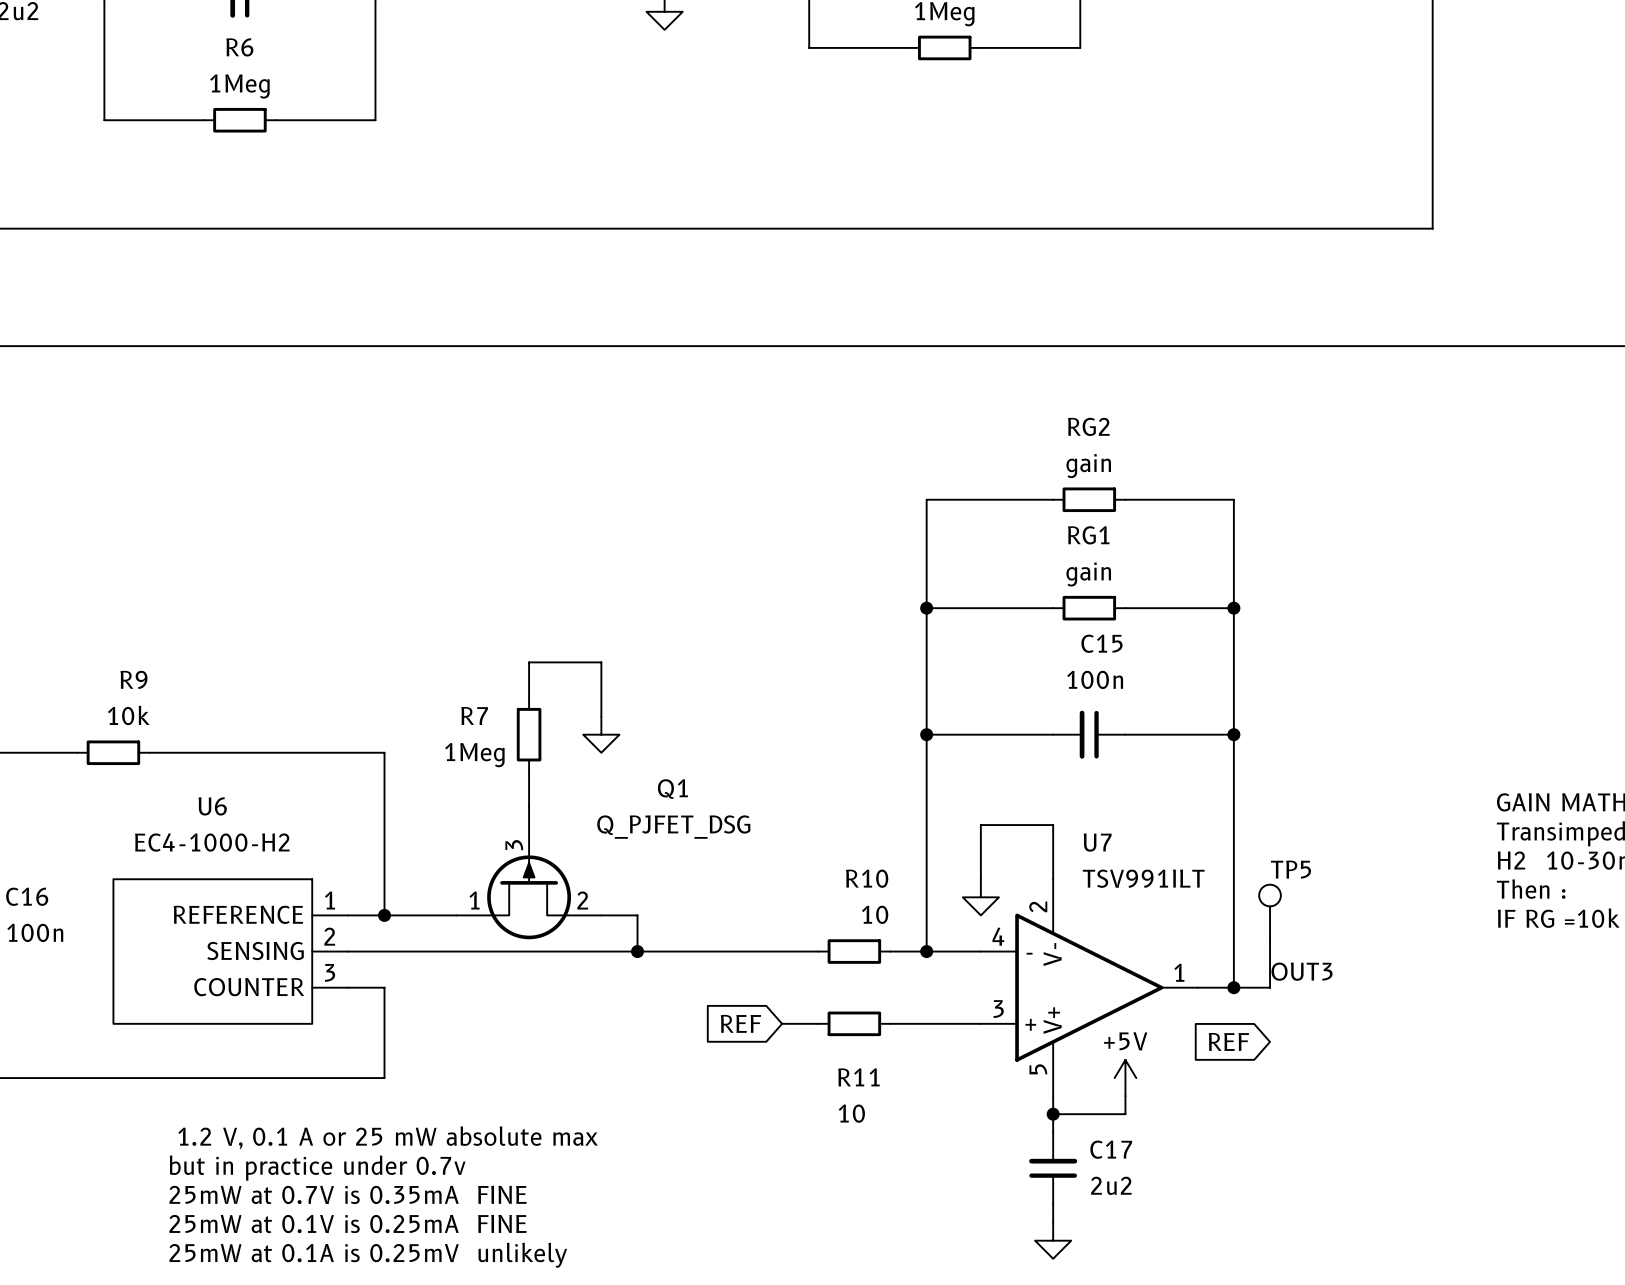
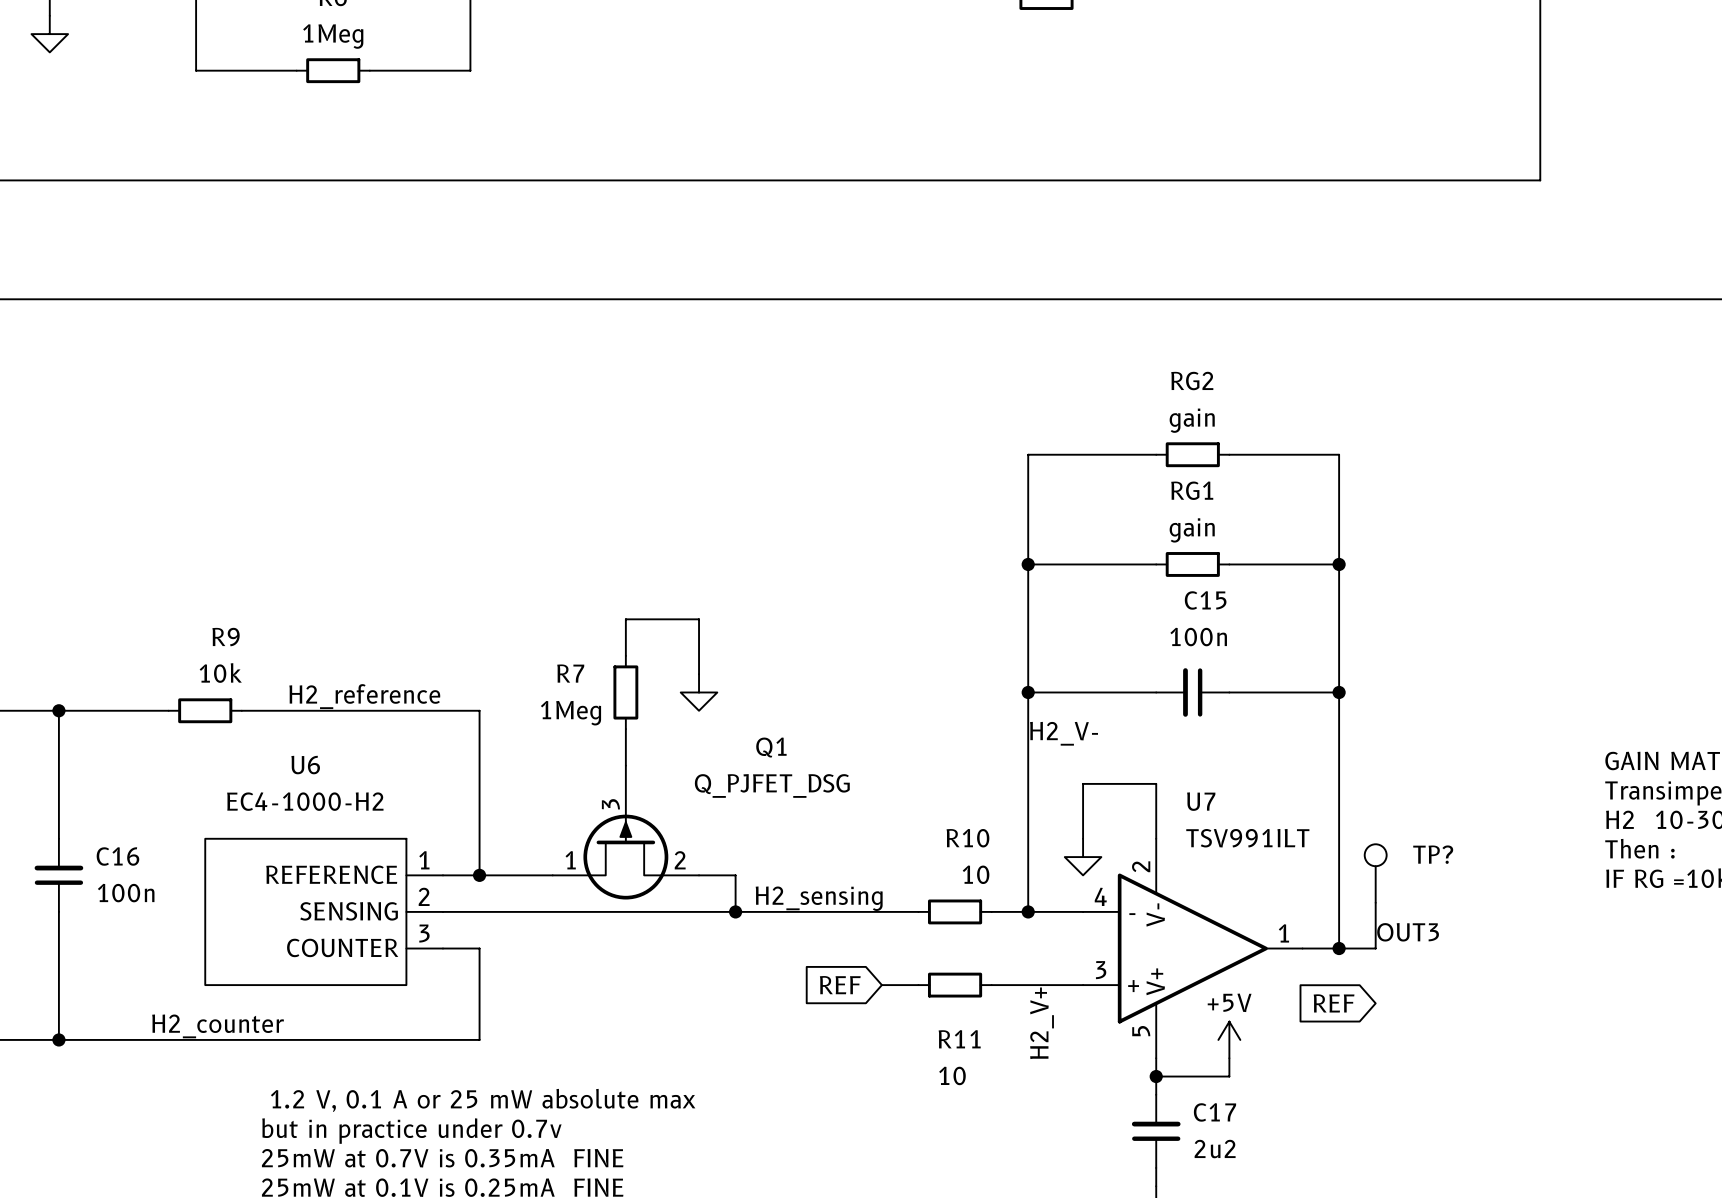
label: none -> H2_reference (364, 696)
label: none -> H2_V- (1064, 733)
TP5 name: TP5 (1291, 869) -> TP? (1433, 854)
label: none -> H2_sensing (819, 898)
label: none -> H2_V+ (1042, 1023)
label: none -> H2_counter (218, 1026)

